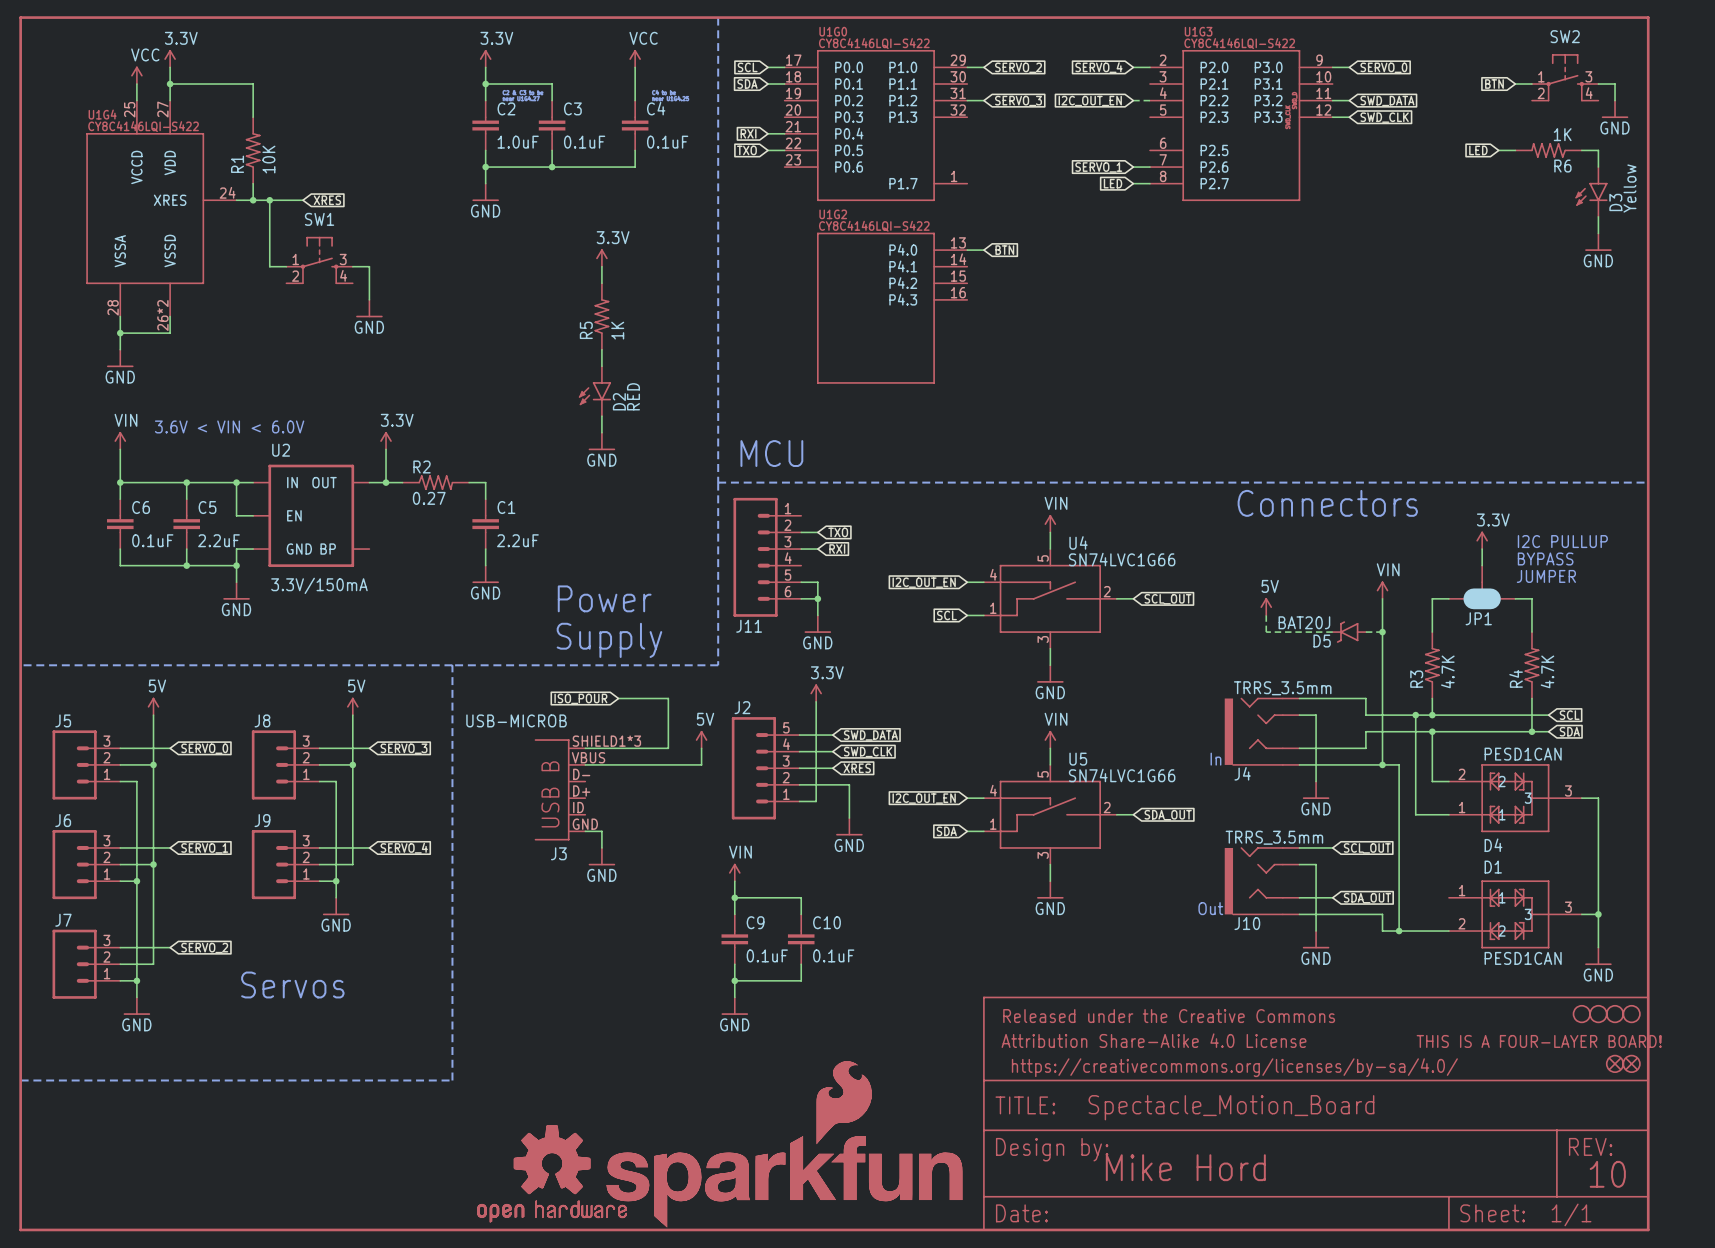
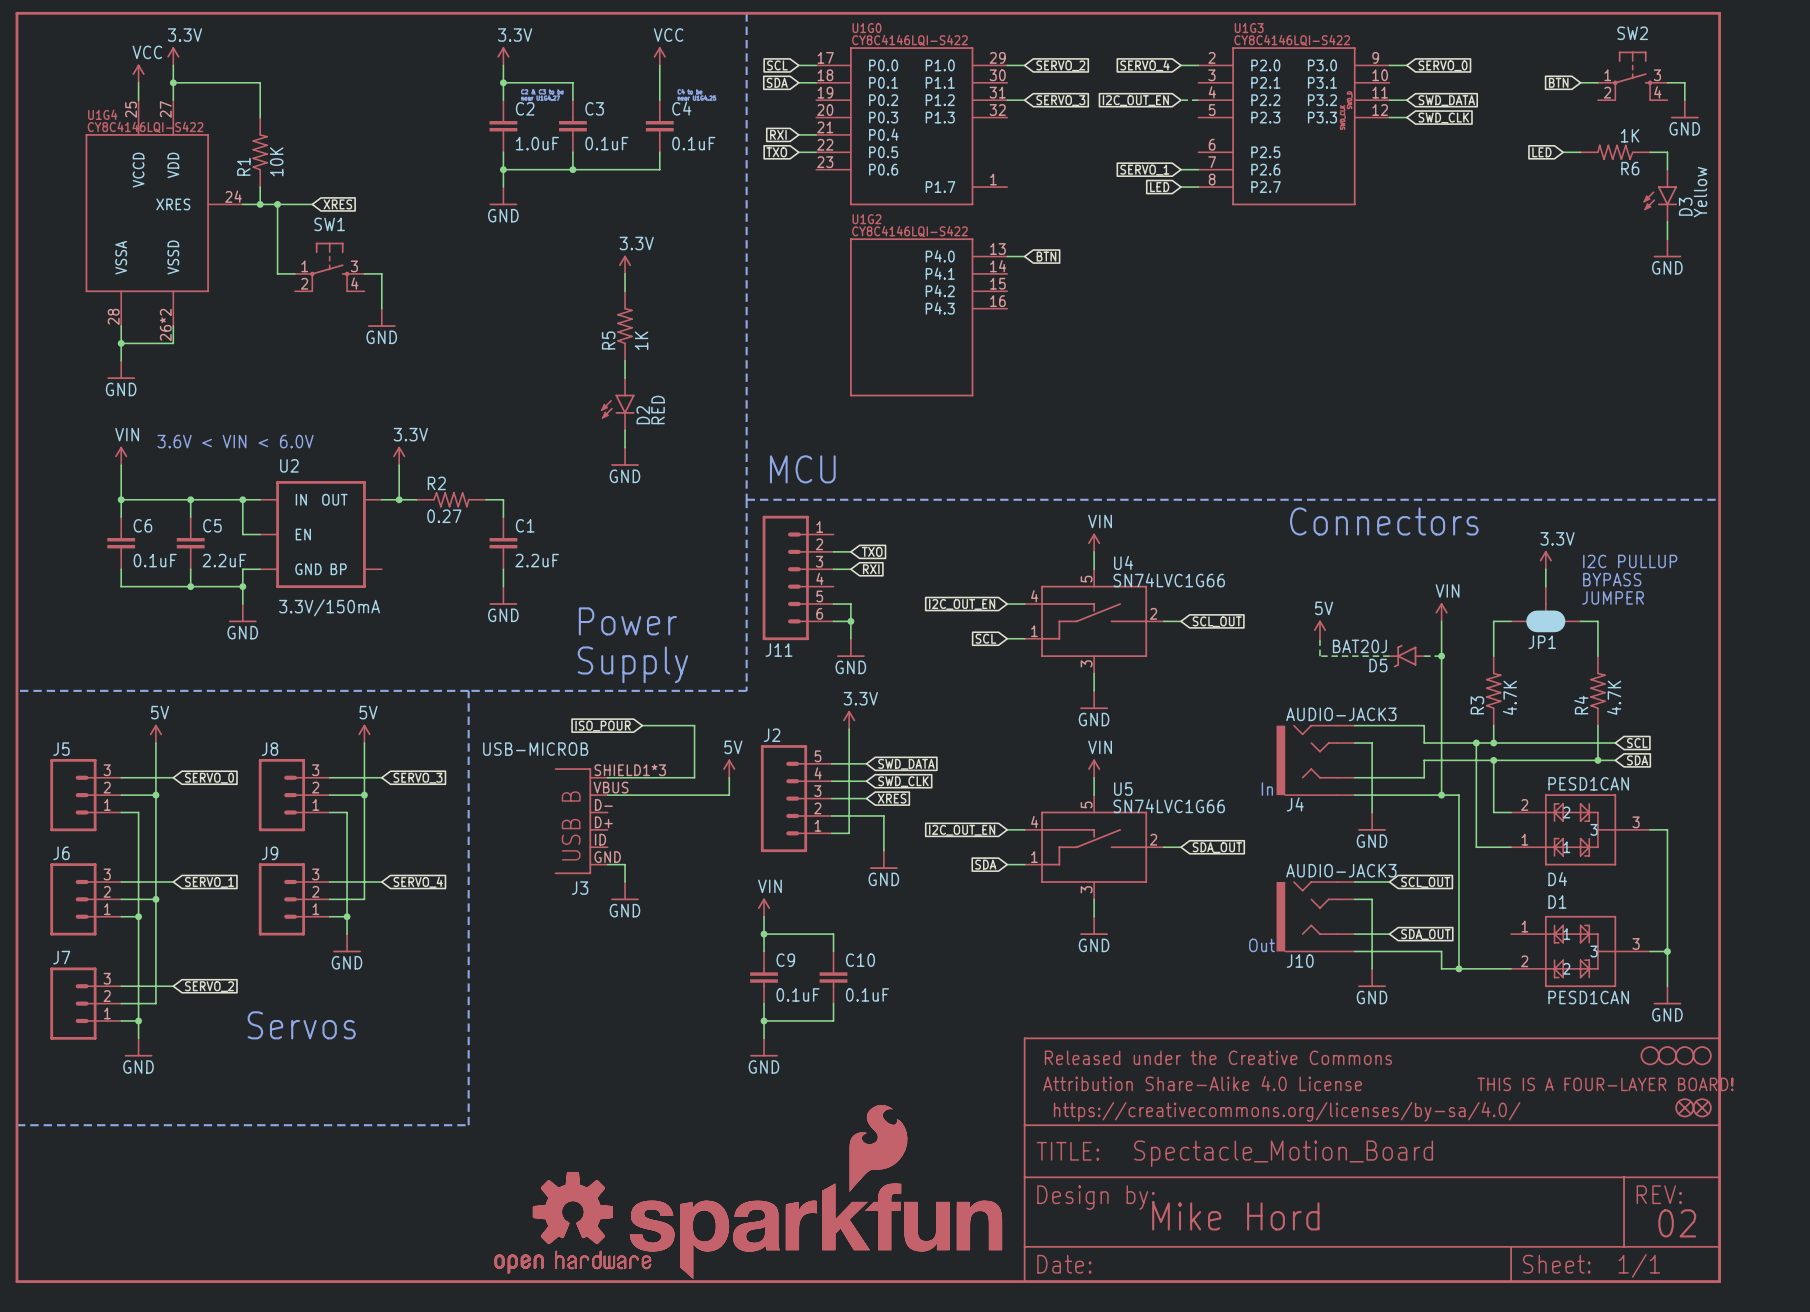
J4 value: TRRS_3.5mm (1282, 688) -> AUDIO-JACK3 (1341, 714)
J10 value: TRRS_3.5mm (1274, 837) -> AUDIO-JACK3 (1341, 870)
text: 10 (1607, 1174) -> 02 (1677, 1223)

